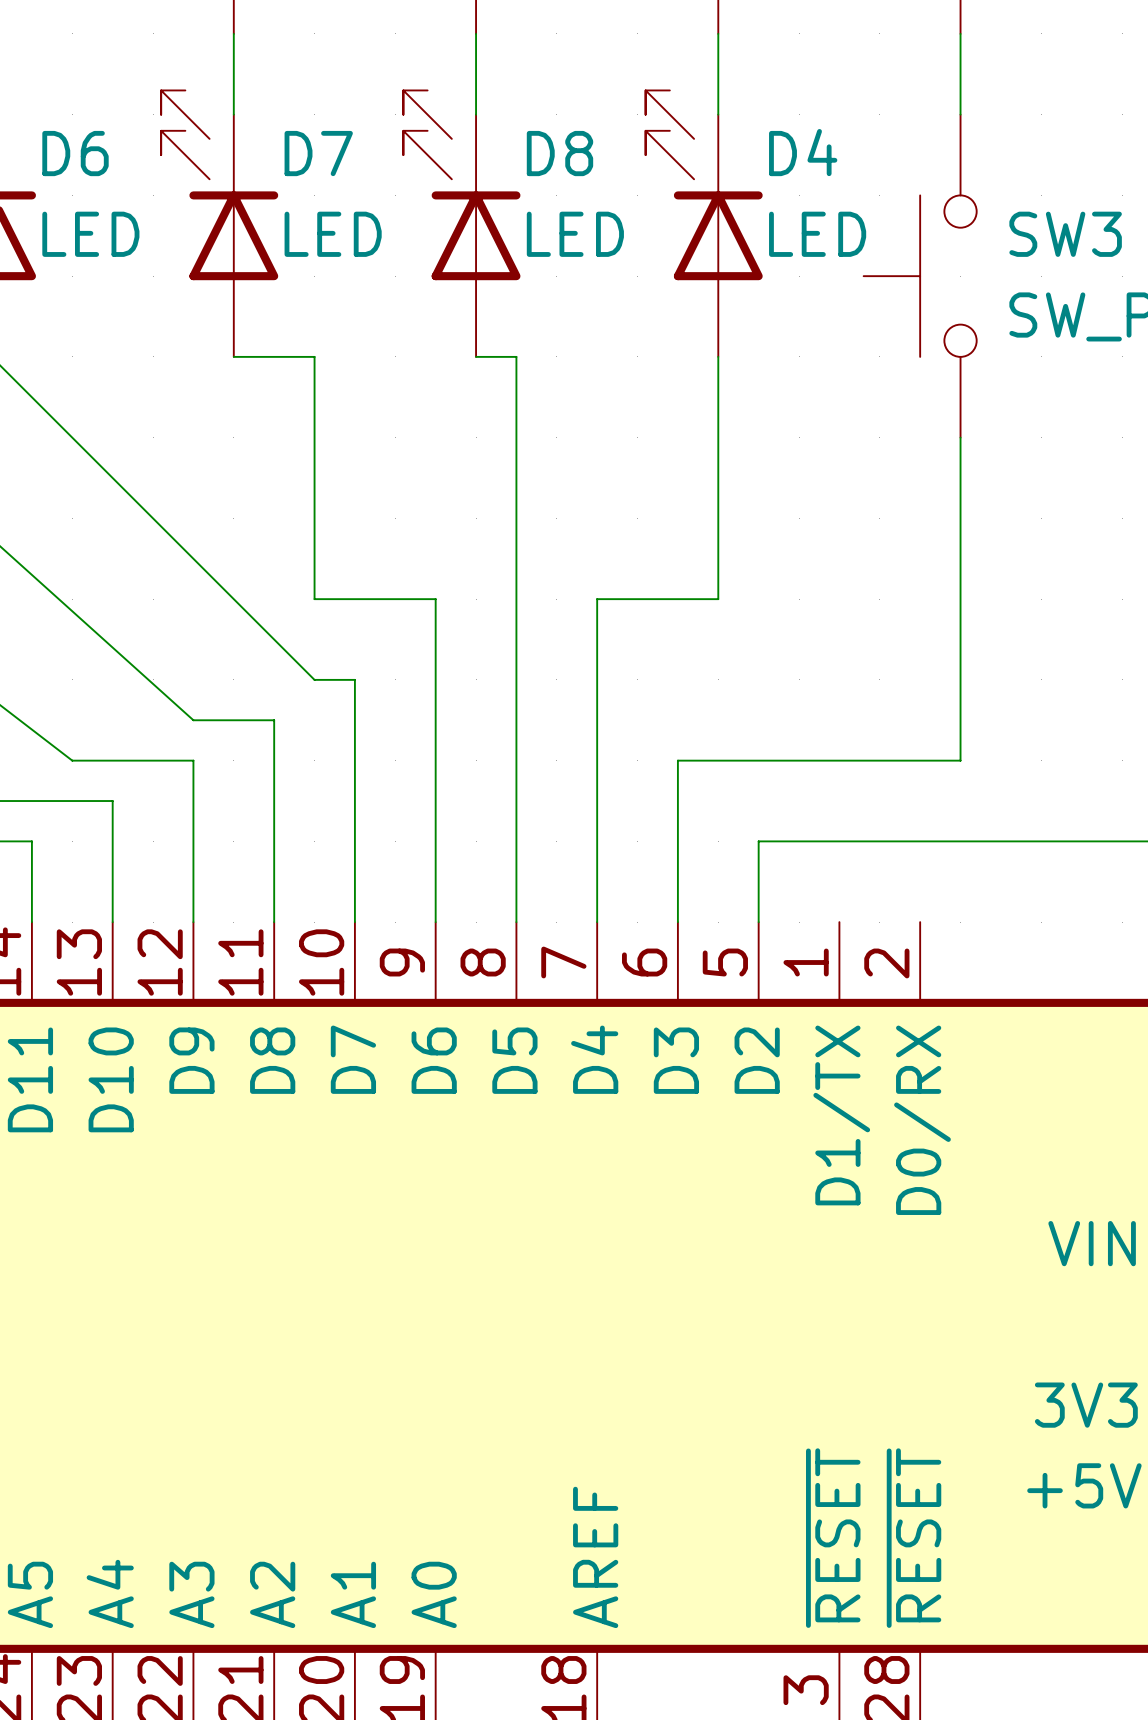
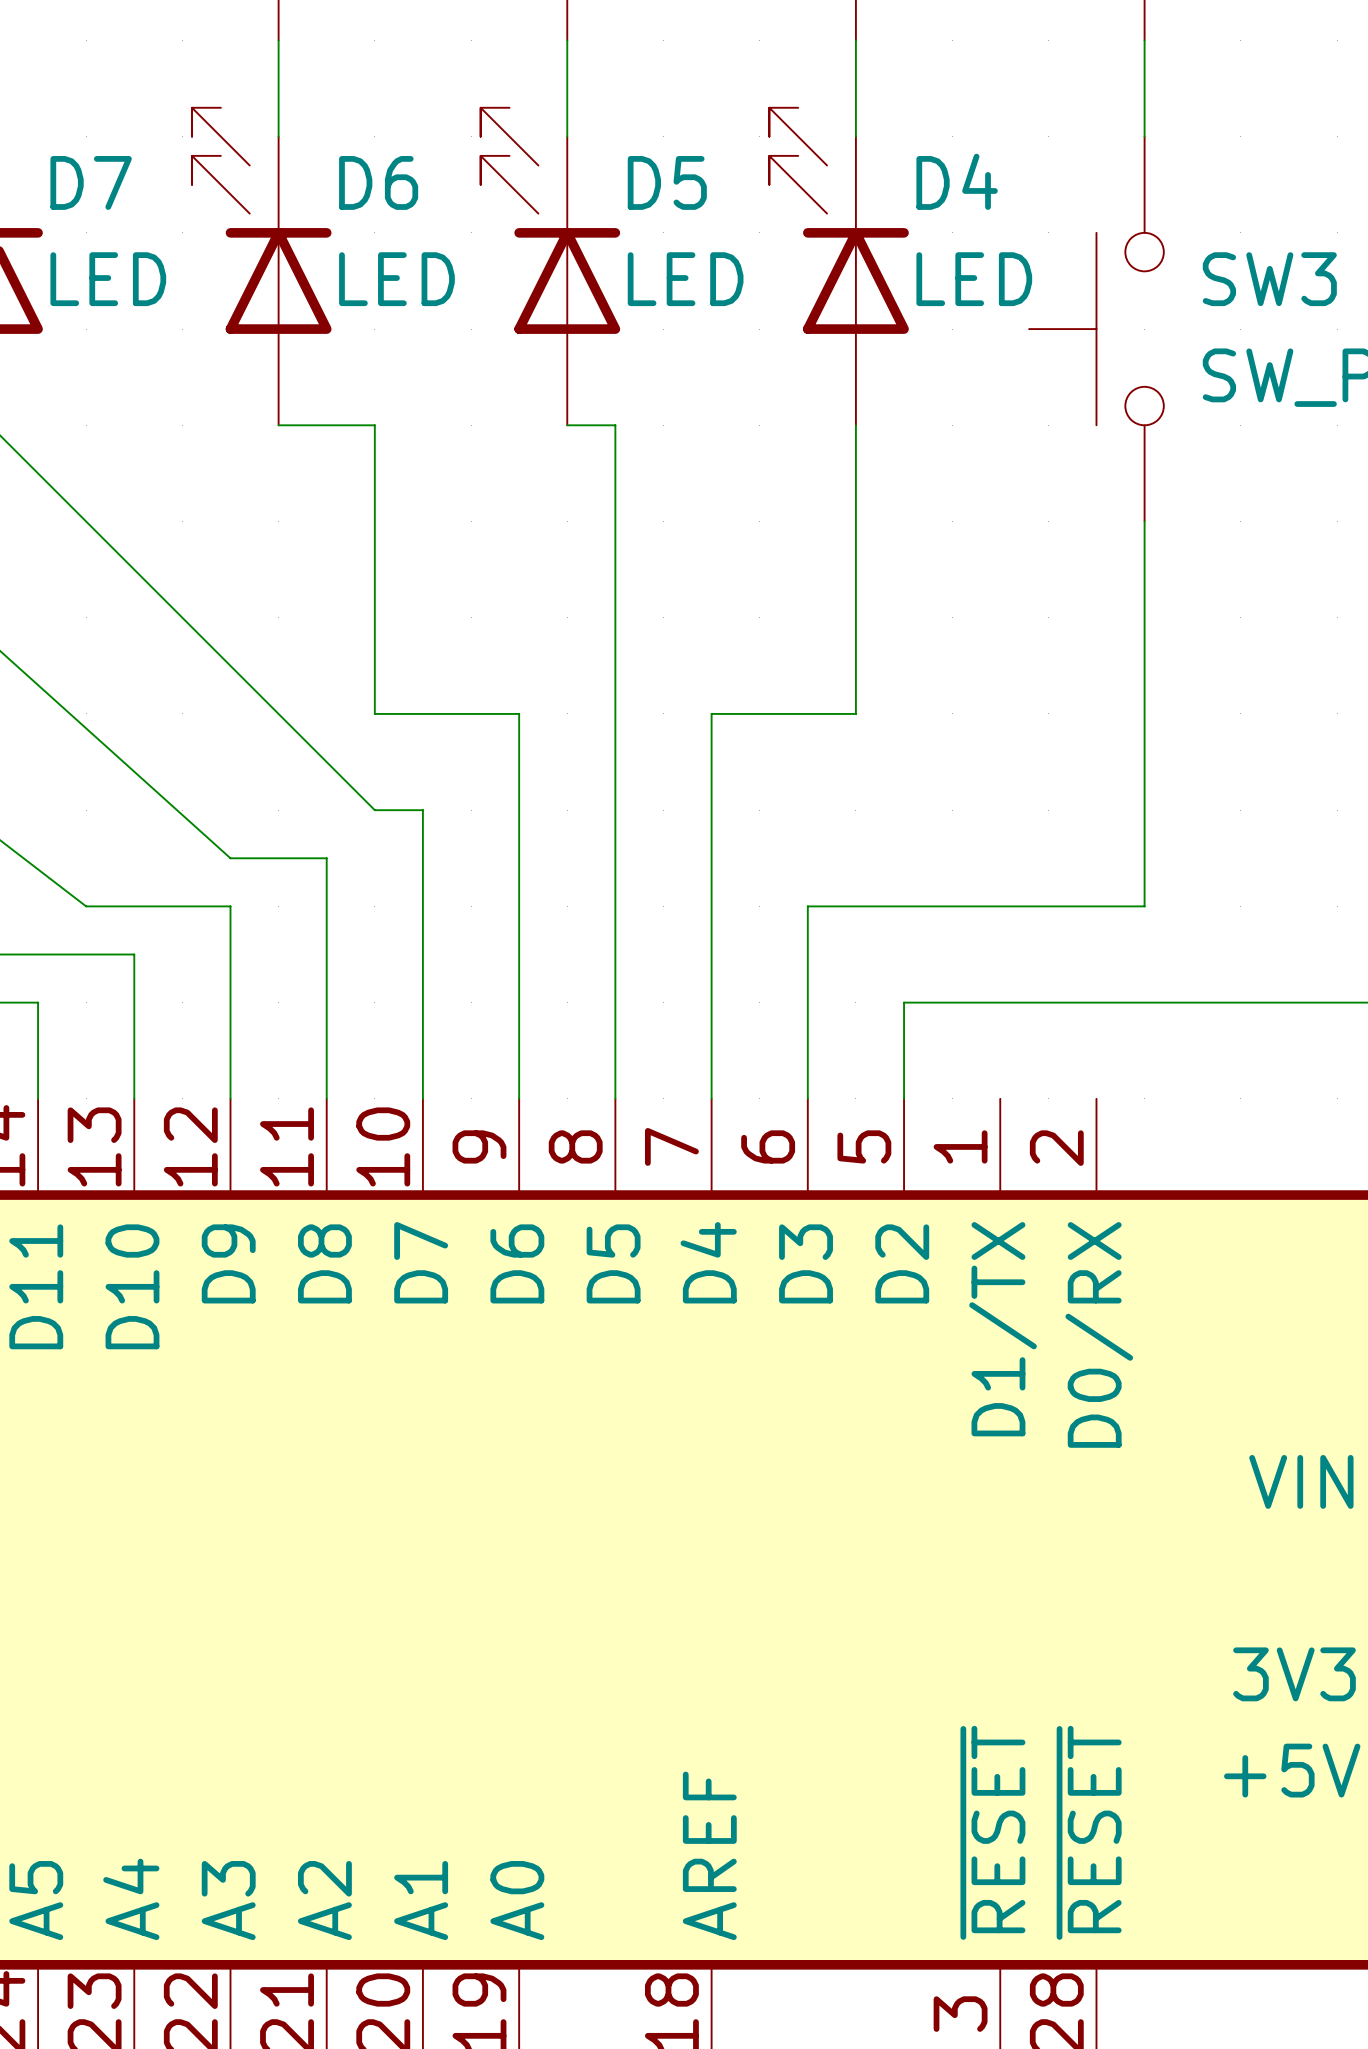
D6 name: D6 (75, 153) -> D7 (91, 182)
D7 name: D7 (318, 153) -> D6 (378, 182)
D8 name: D8 (559, 153) -> D5 (667, 182)

